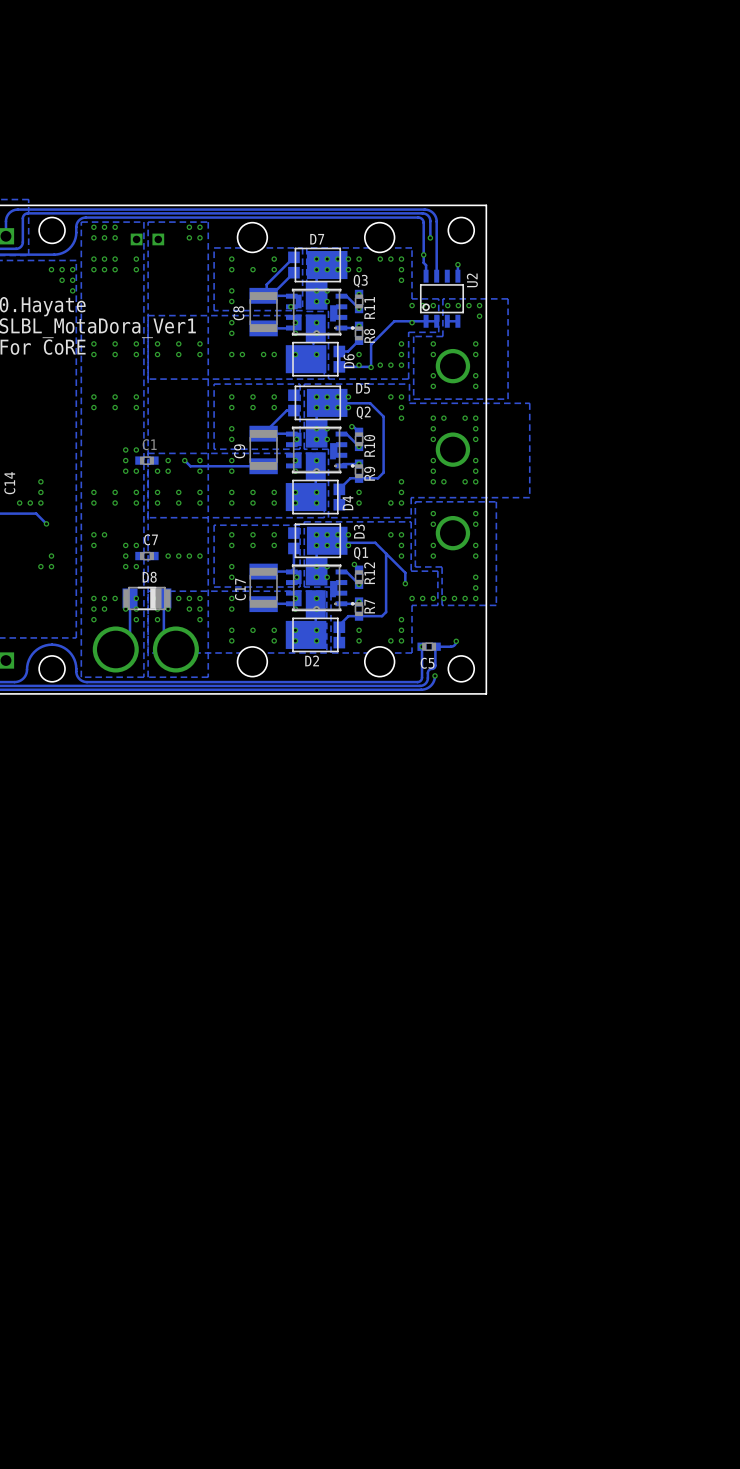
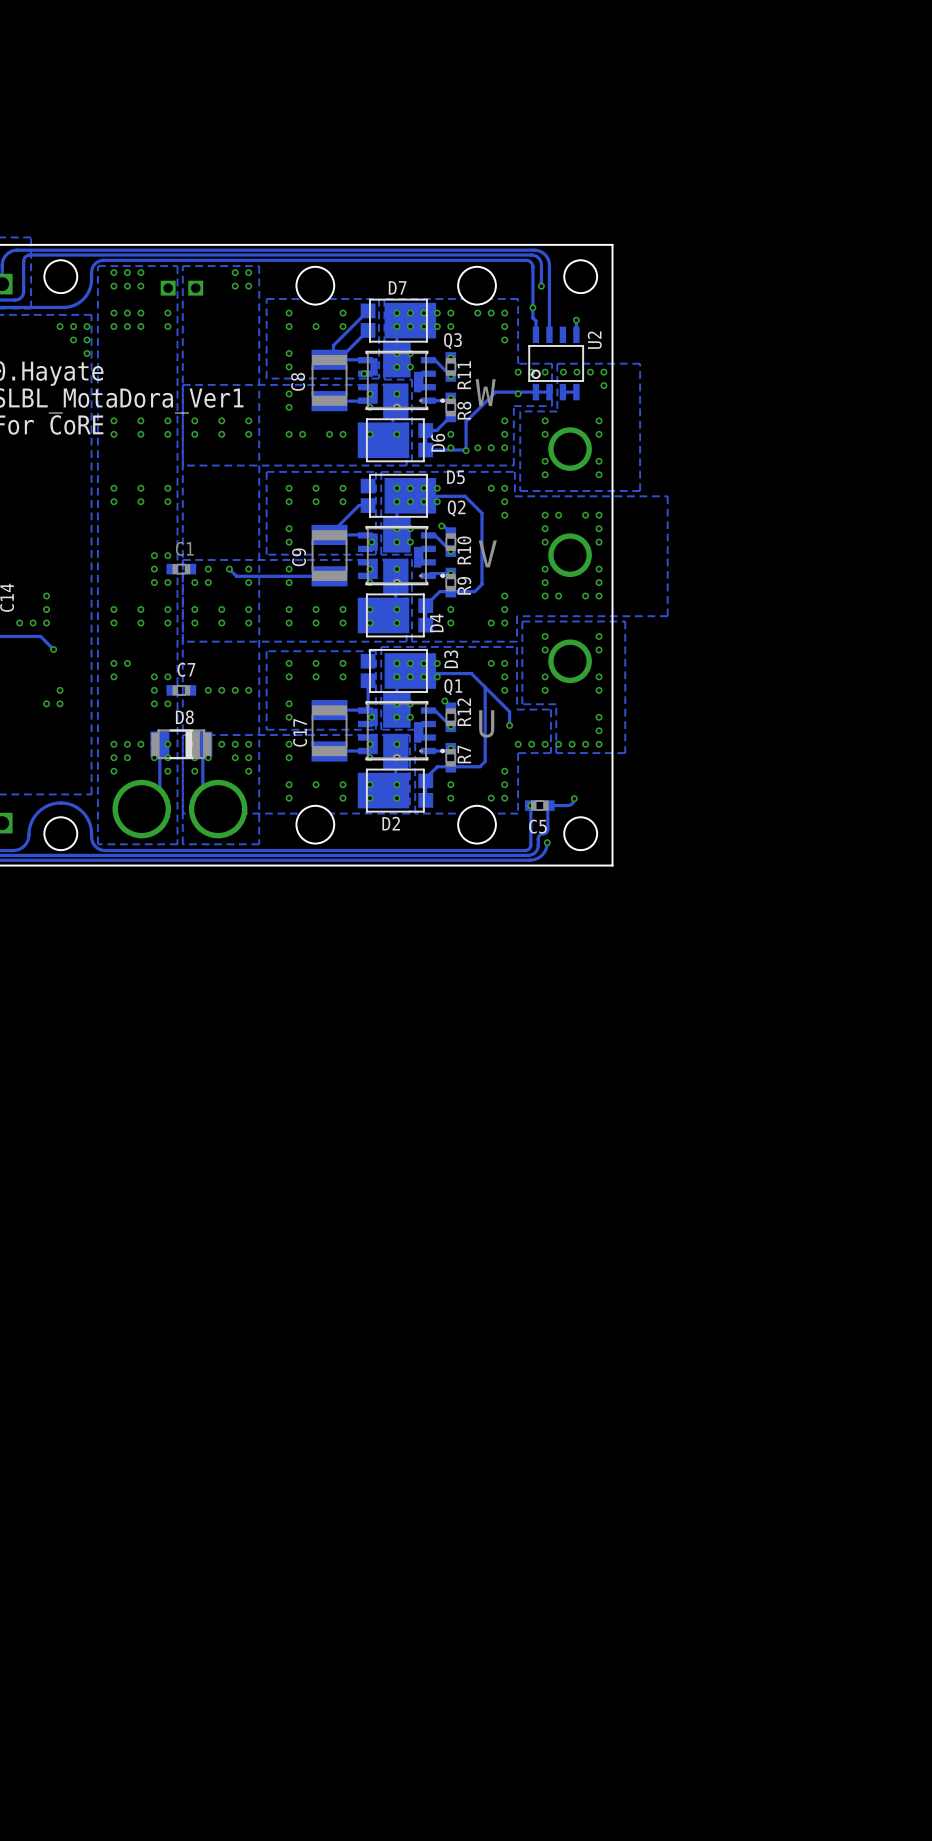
text: none -> W (485, 392)
text: none -> V (487, 553)
text: none -> U (486, 723)

